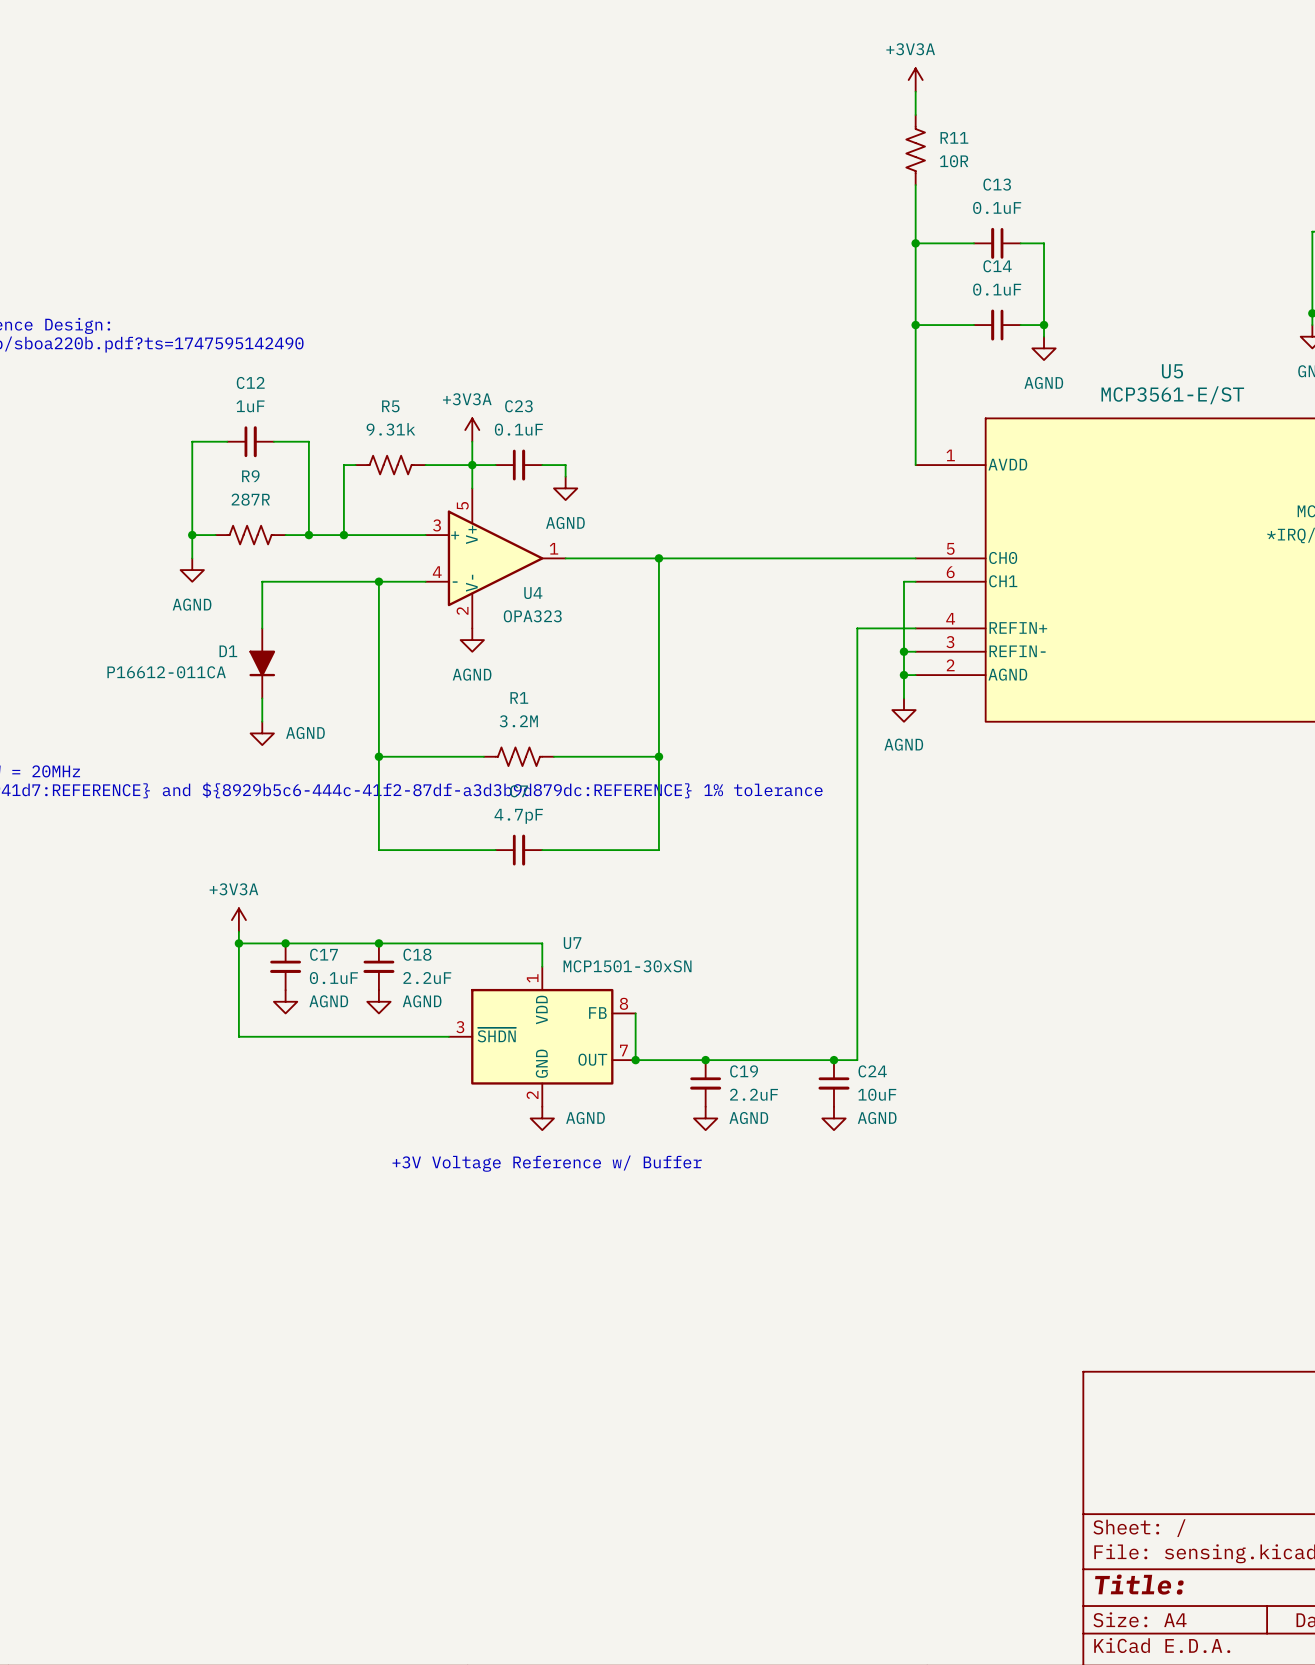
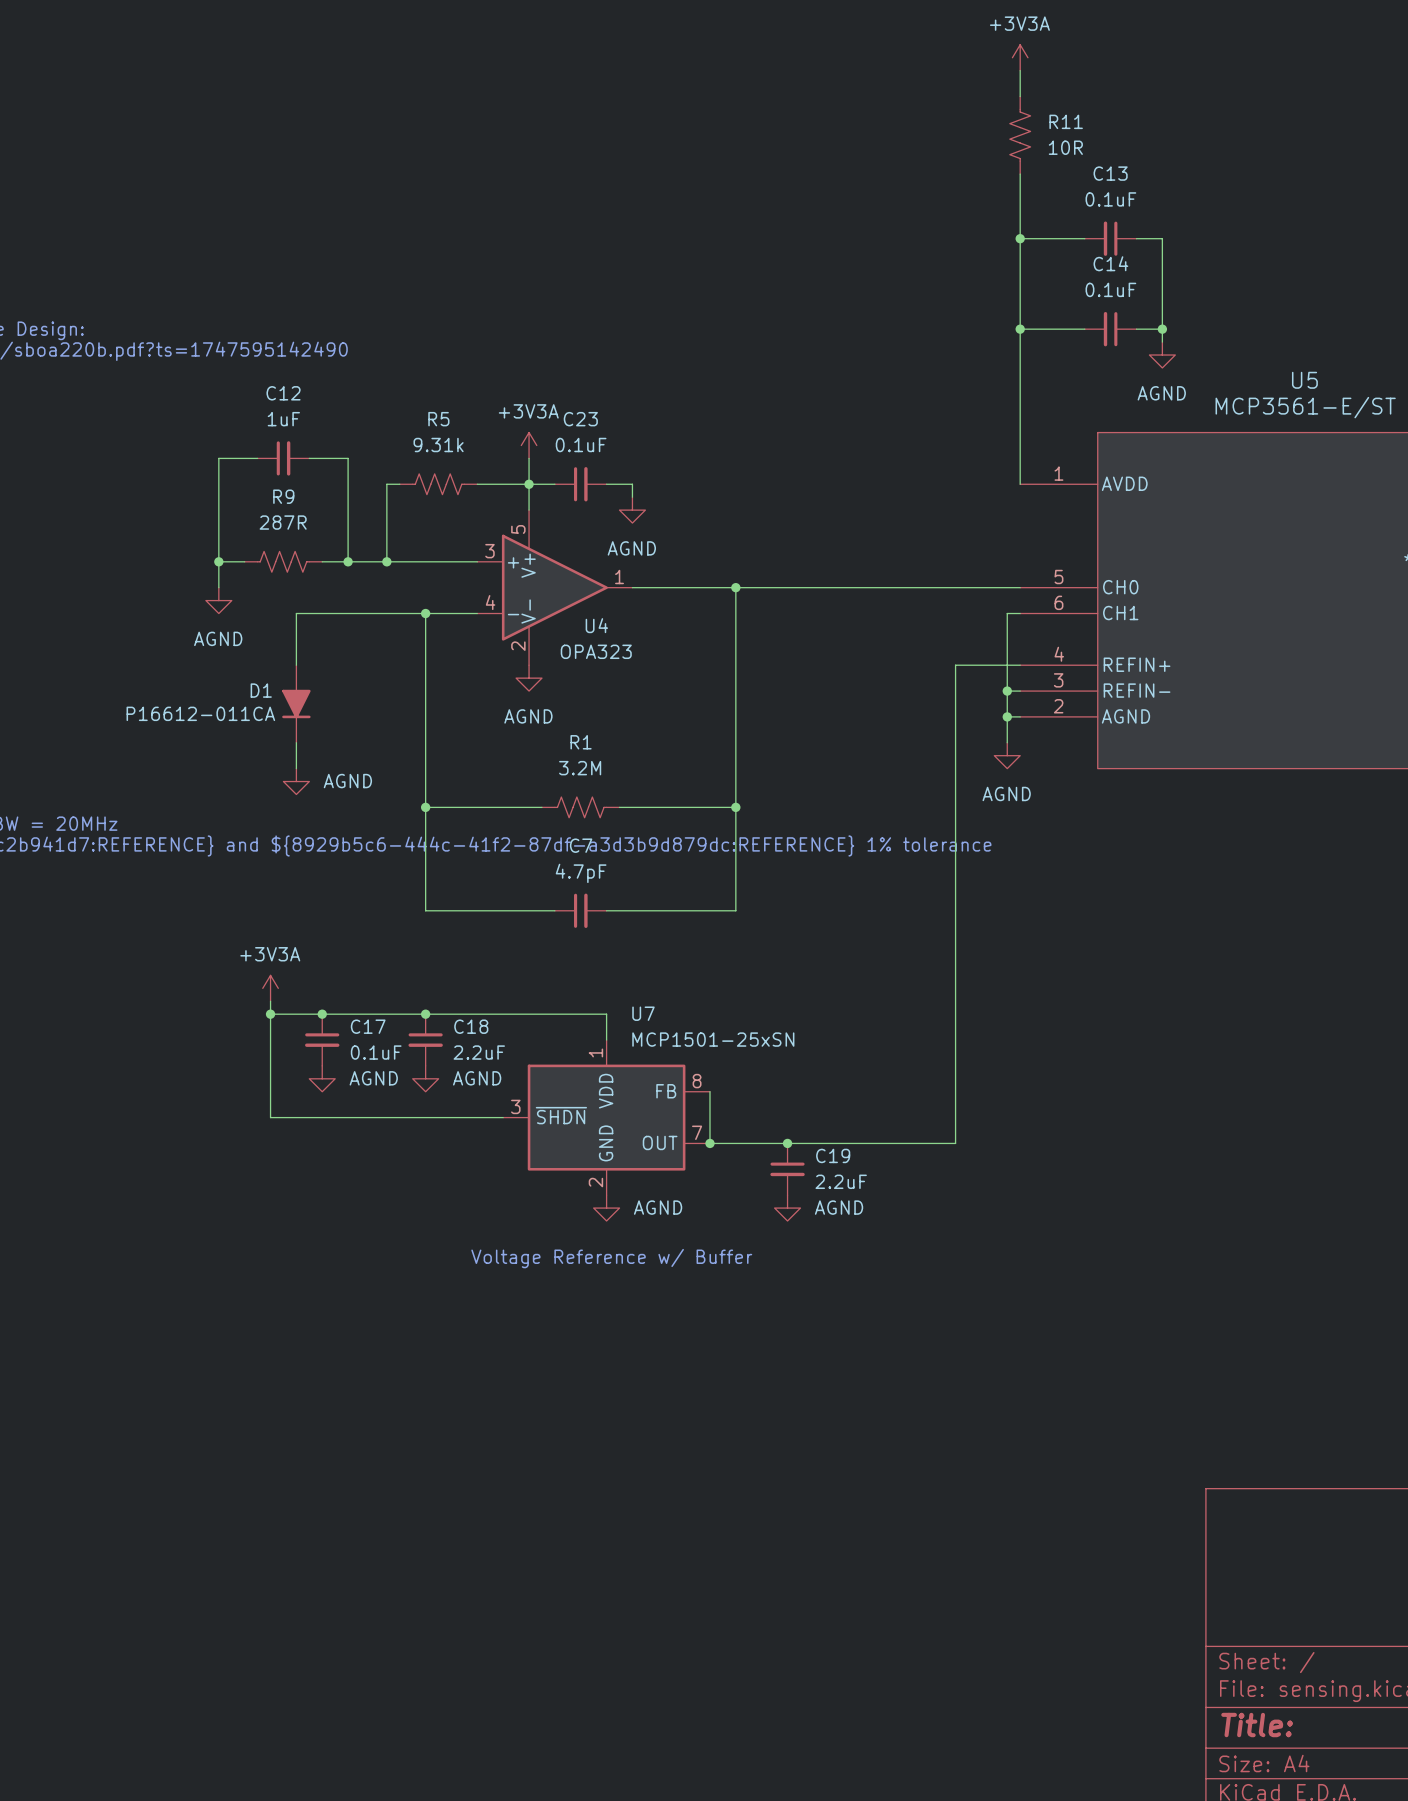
U7 value: MCP1501-30xSN (627, 966) -> MCP1501-25xSN (713, 1039)
junction: (833, 1060) -> none
C24: 10uF (833, 1083) -> none
power symbol: AGND (833, 1118) -> none
text: +3V Voltage Reference w/ Buffer (547, 1163) -> Voltage Reference w/ Buffer (611, 1258)

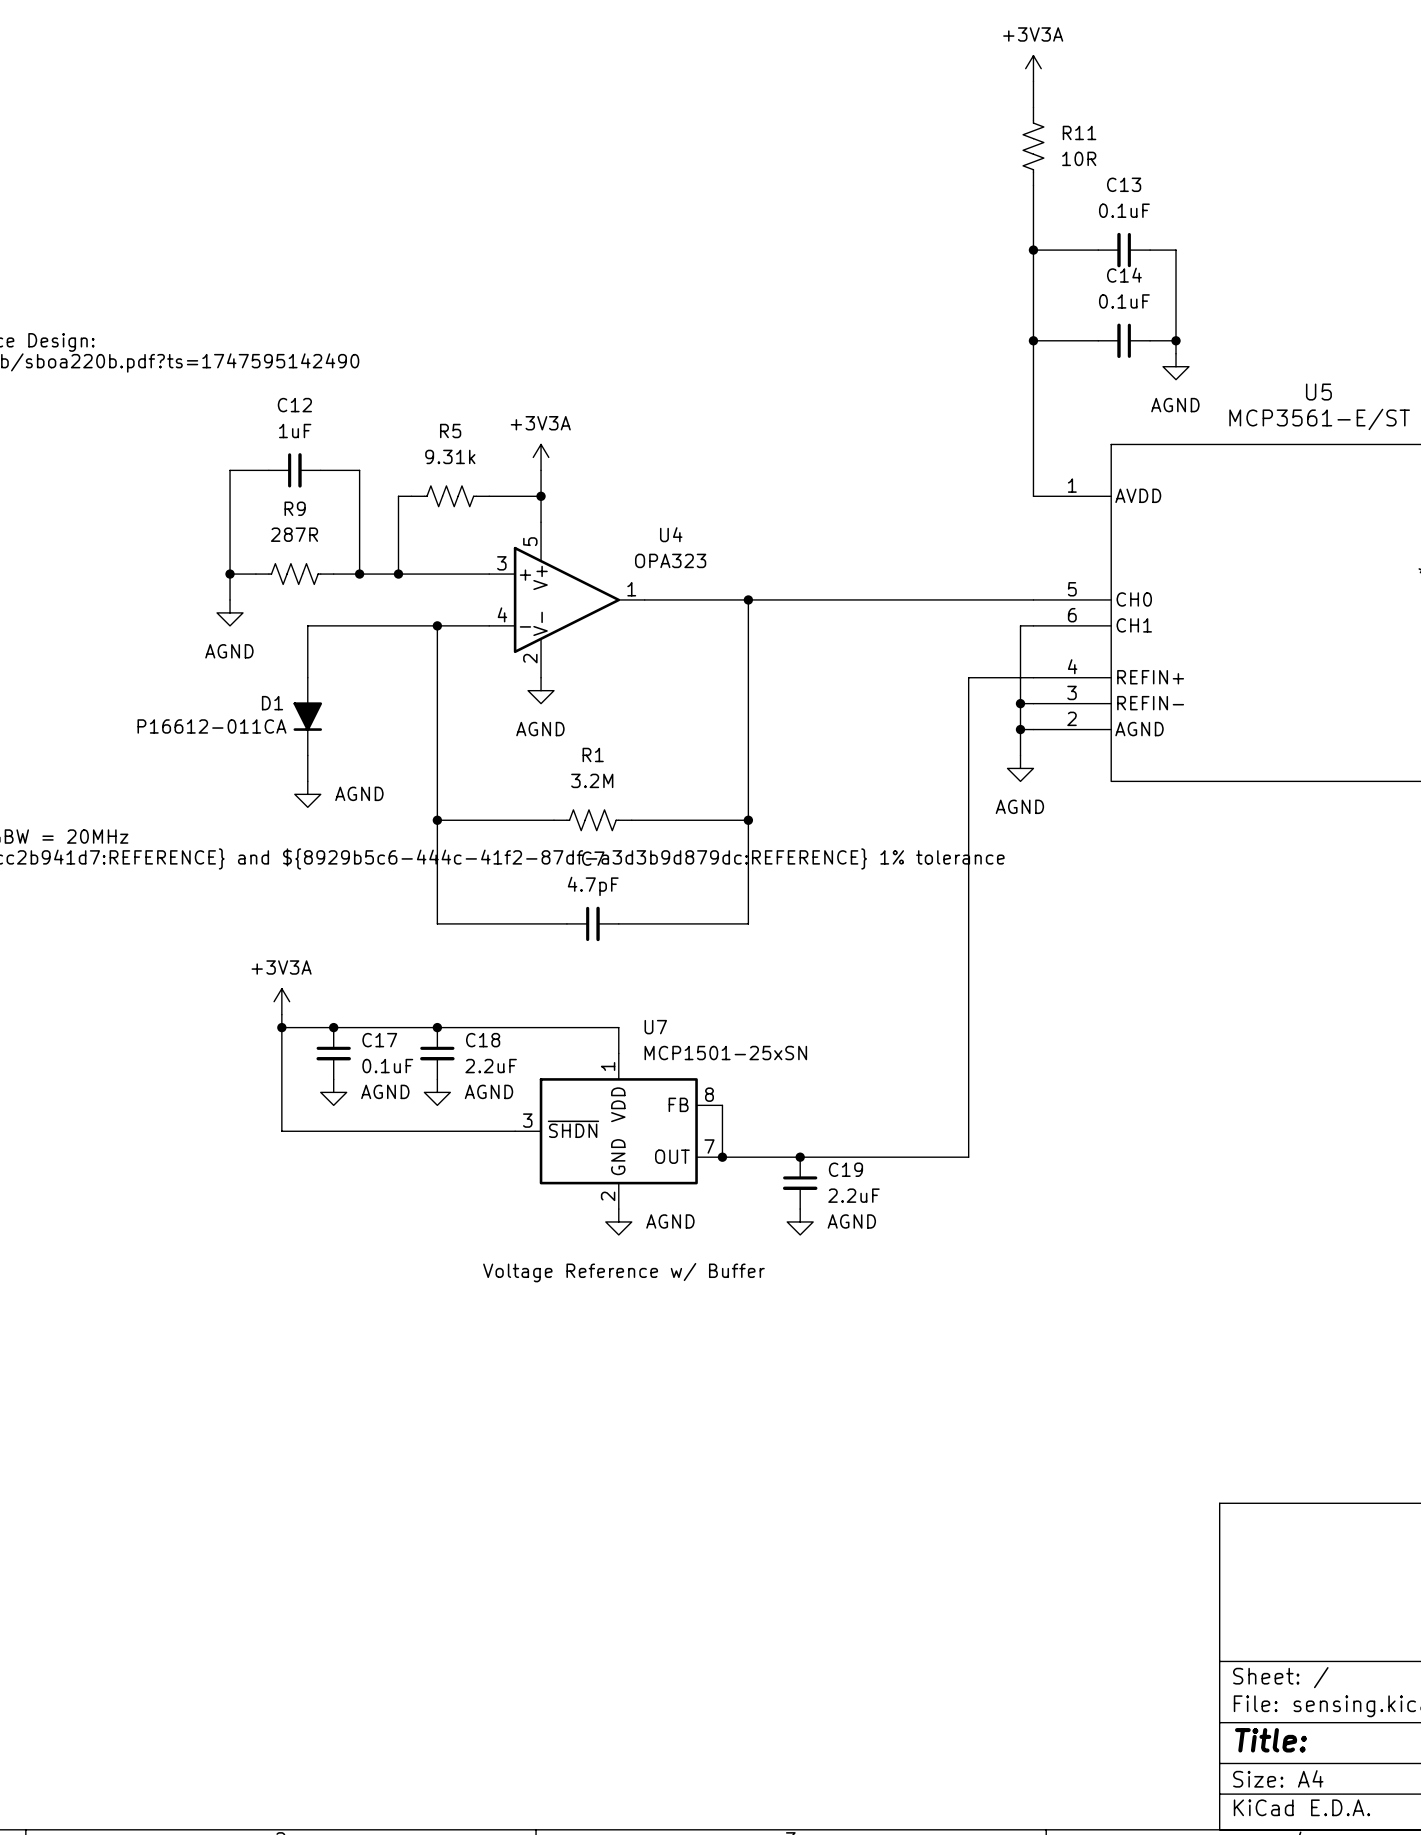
wire: (529, 484) (554, 484) -> none
C23: 0.1uF (580, 484) -> none
wire: (606, 484) (632, 484) (632, 497) -> none
power symbol: AGND (632, 510) -> none
U4 name position: U4 (596, 625) -> U4 (671, 534)
U4 value position: OPA323 (596, 651) -> OPA323 (670, 560)

